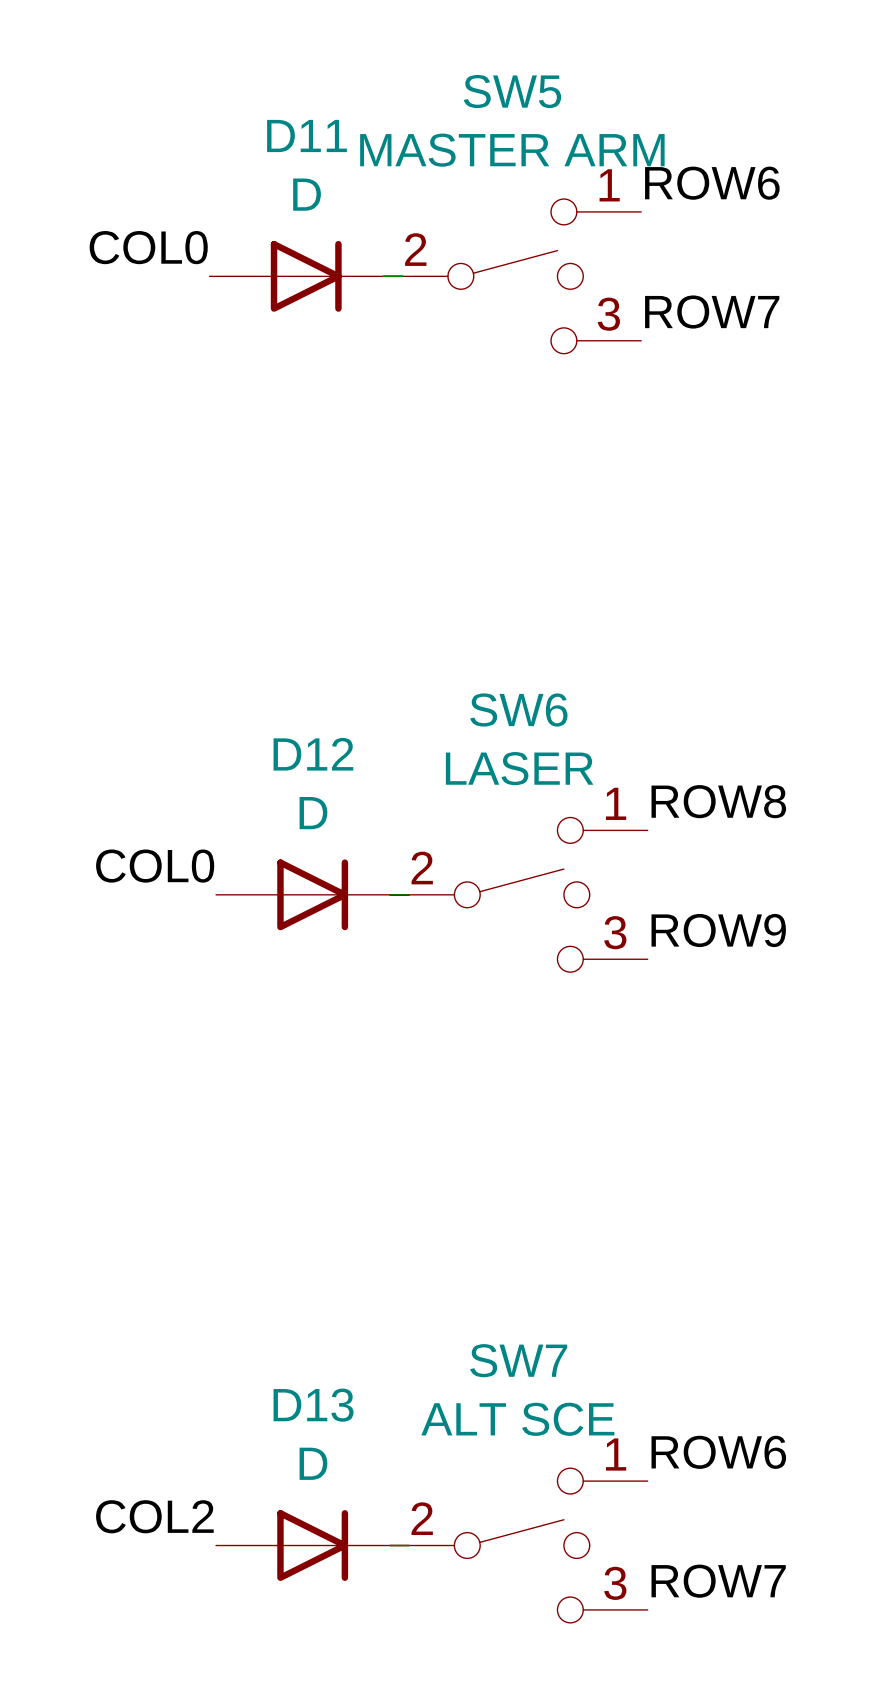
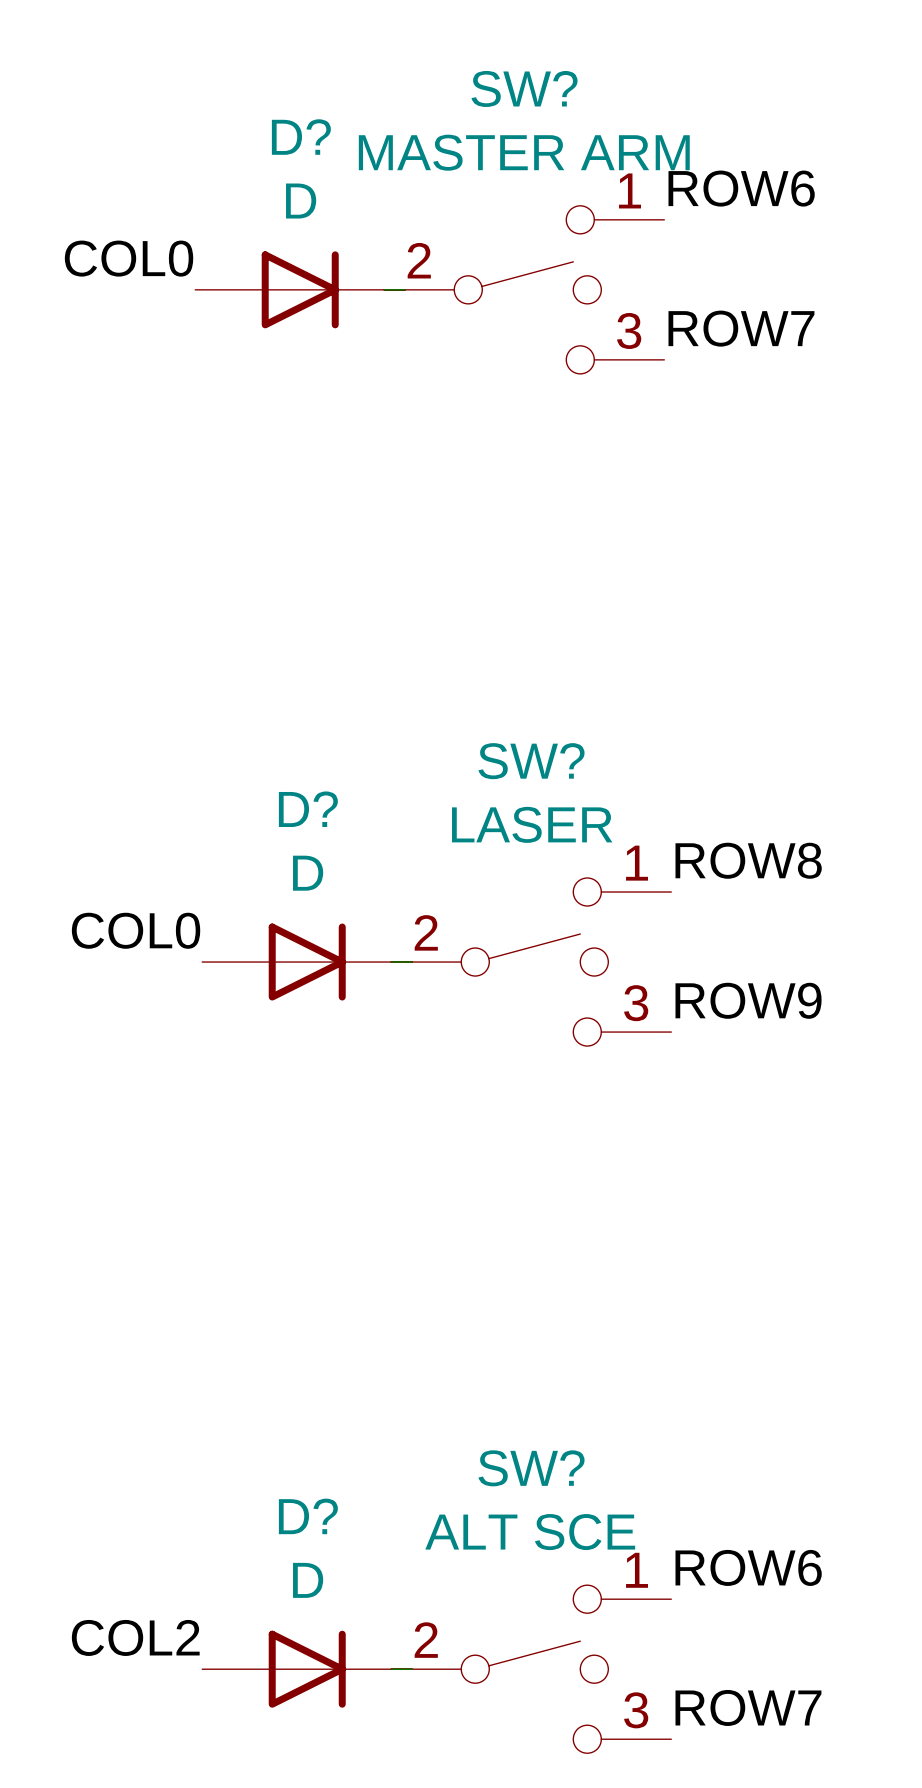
SW5 name: SW5 (512, 91) -> SW? (524, 88)
D11 name: D11 (307, 135) -> D? (301, 137)
SW6 name: SW6 (518, 710) -> SW? (531, 761)
D12 name: D12 (313, 754) -> D? (308, 809)
SW7 name: SW7 (518, 1360) -> SW? (531, 1468)
D13 name: D13 (313, 1405) -> D? (308, 1516)

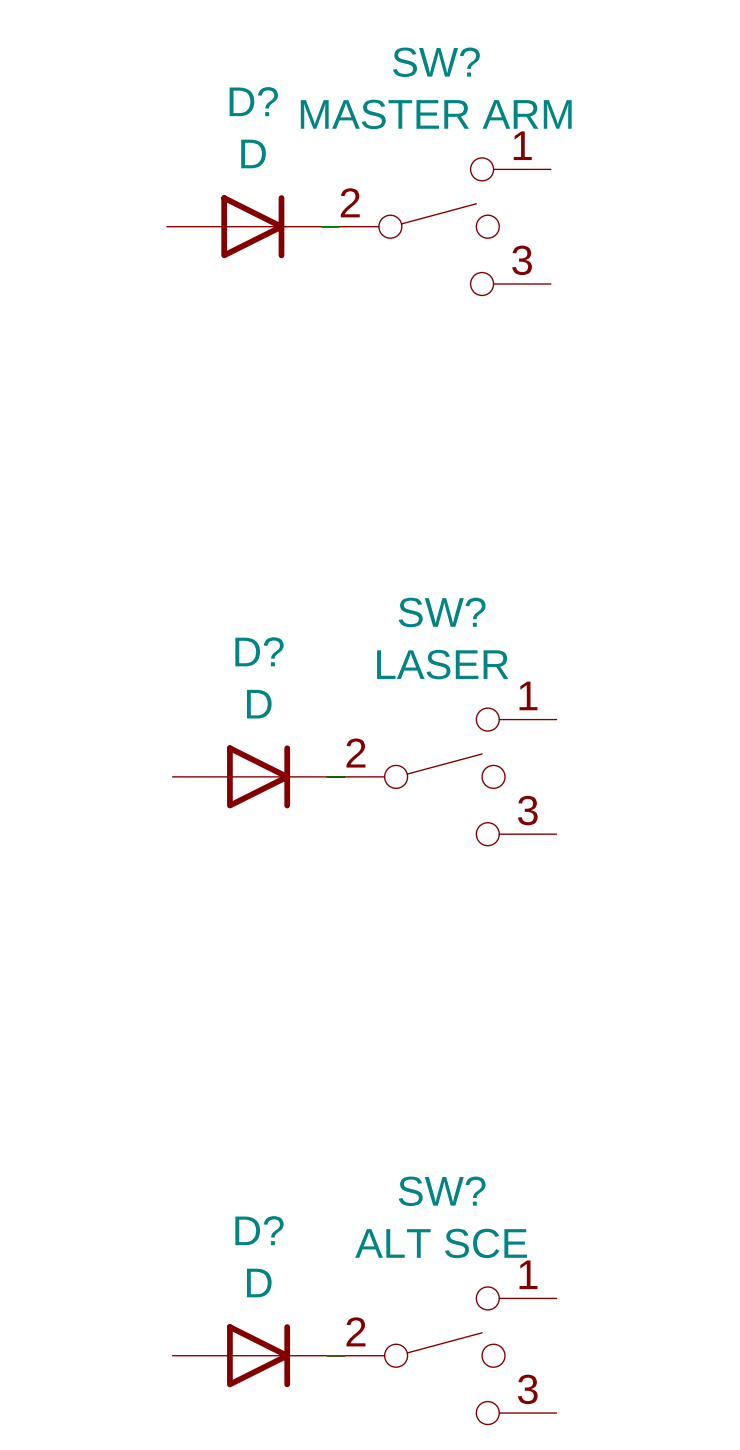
label: ROW6 (741, 188) -> none
label: COL0 (129, 258) -> none
label: ROW7 (741, 328) -> none
label: ROW8 (748, 860) -> none
label: COL0 (136, 930) -> none
label: ROW9 (748, 1000) -> none
label: ROW6 (748, 1567) -> none
label: COL2 (135, 1637) -> none
label: ROW7 (748, 1707) -> none

